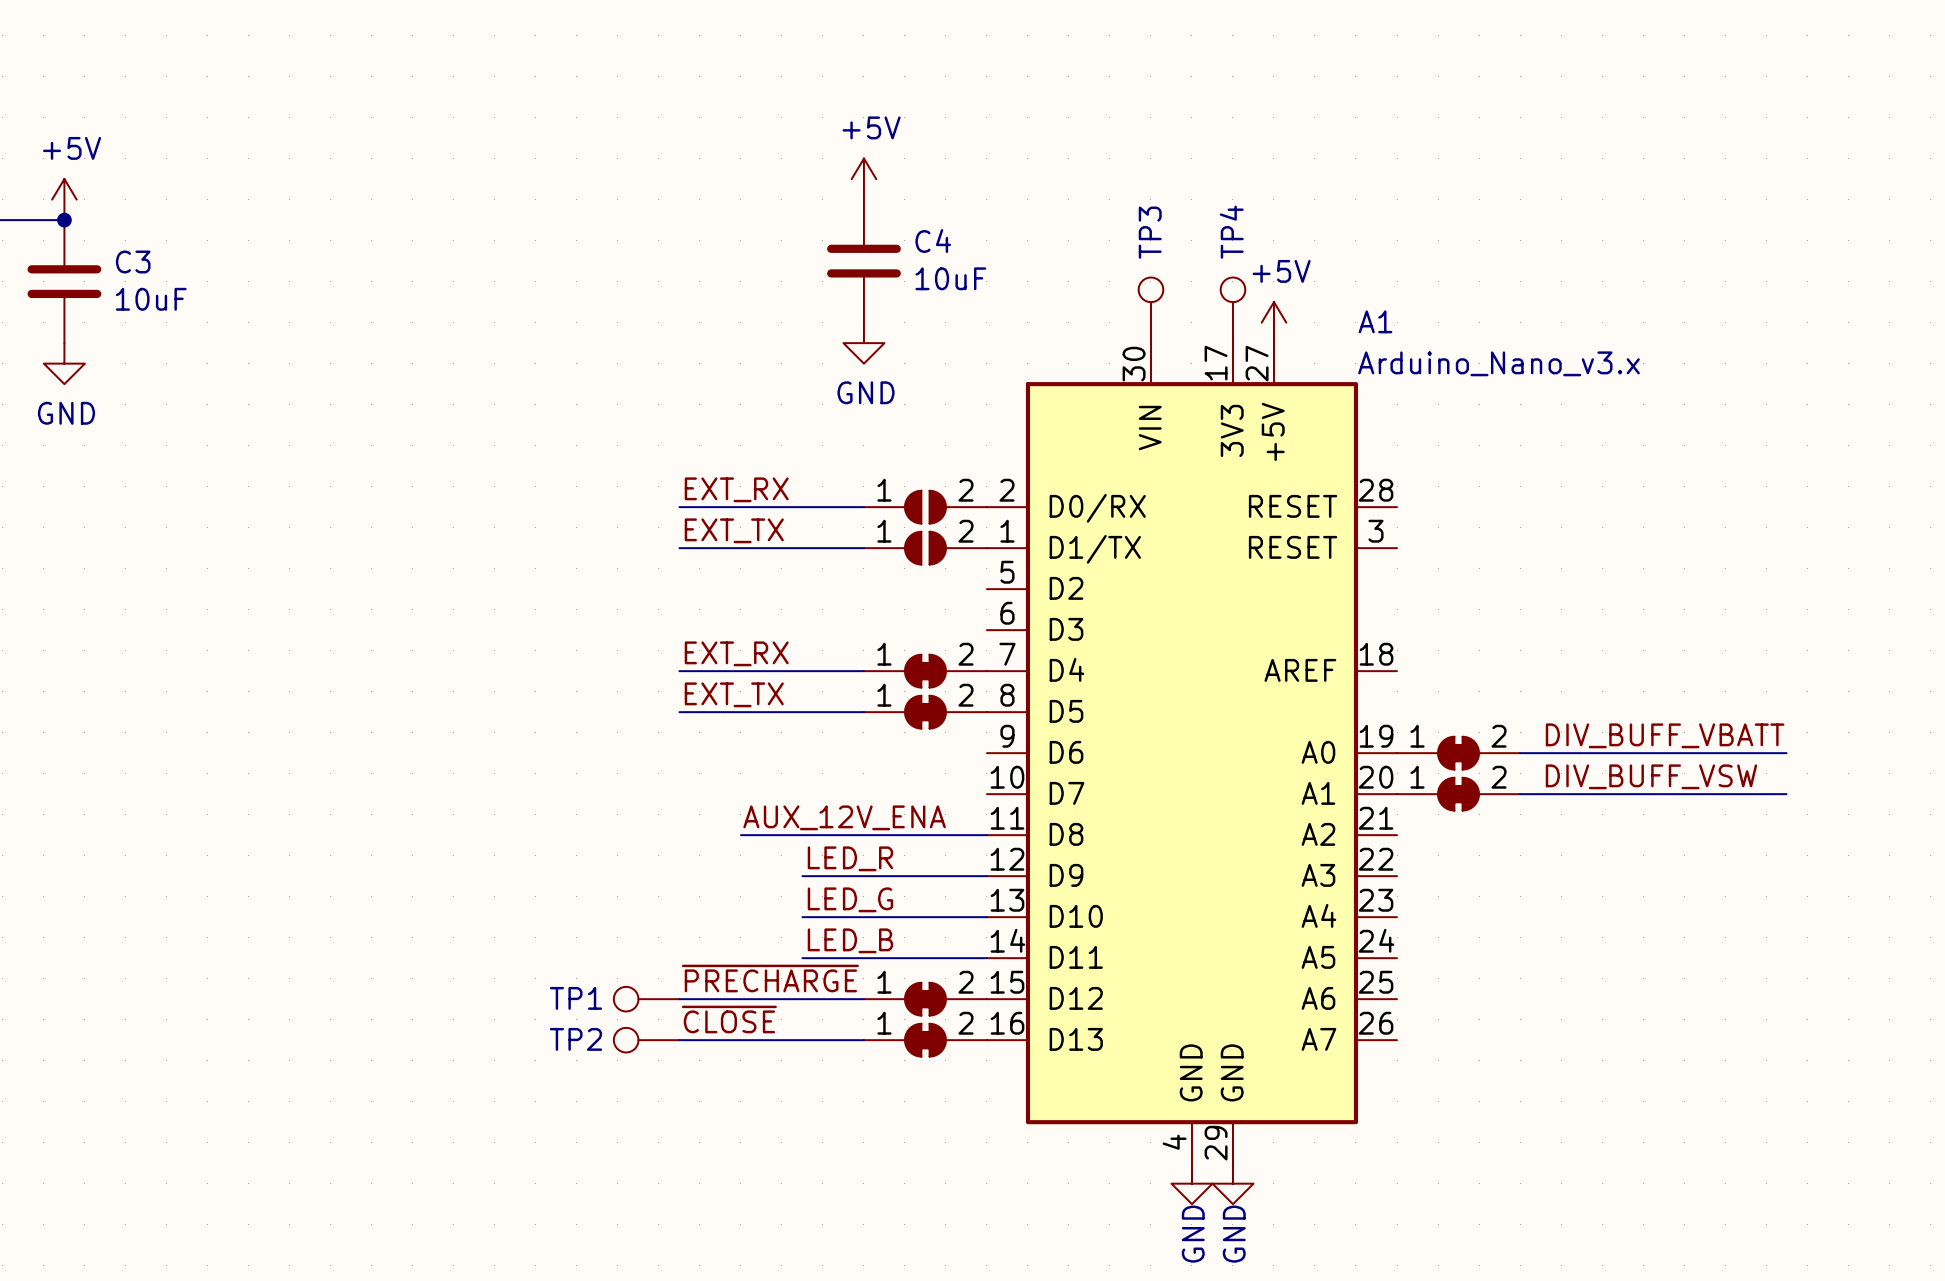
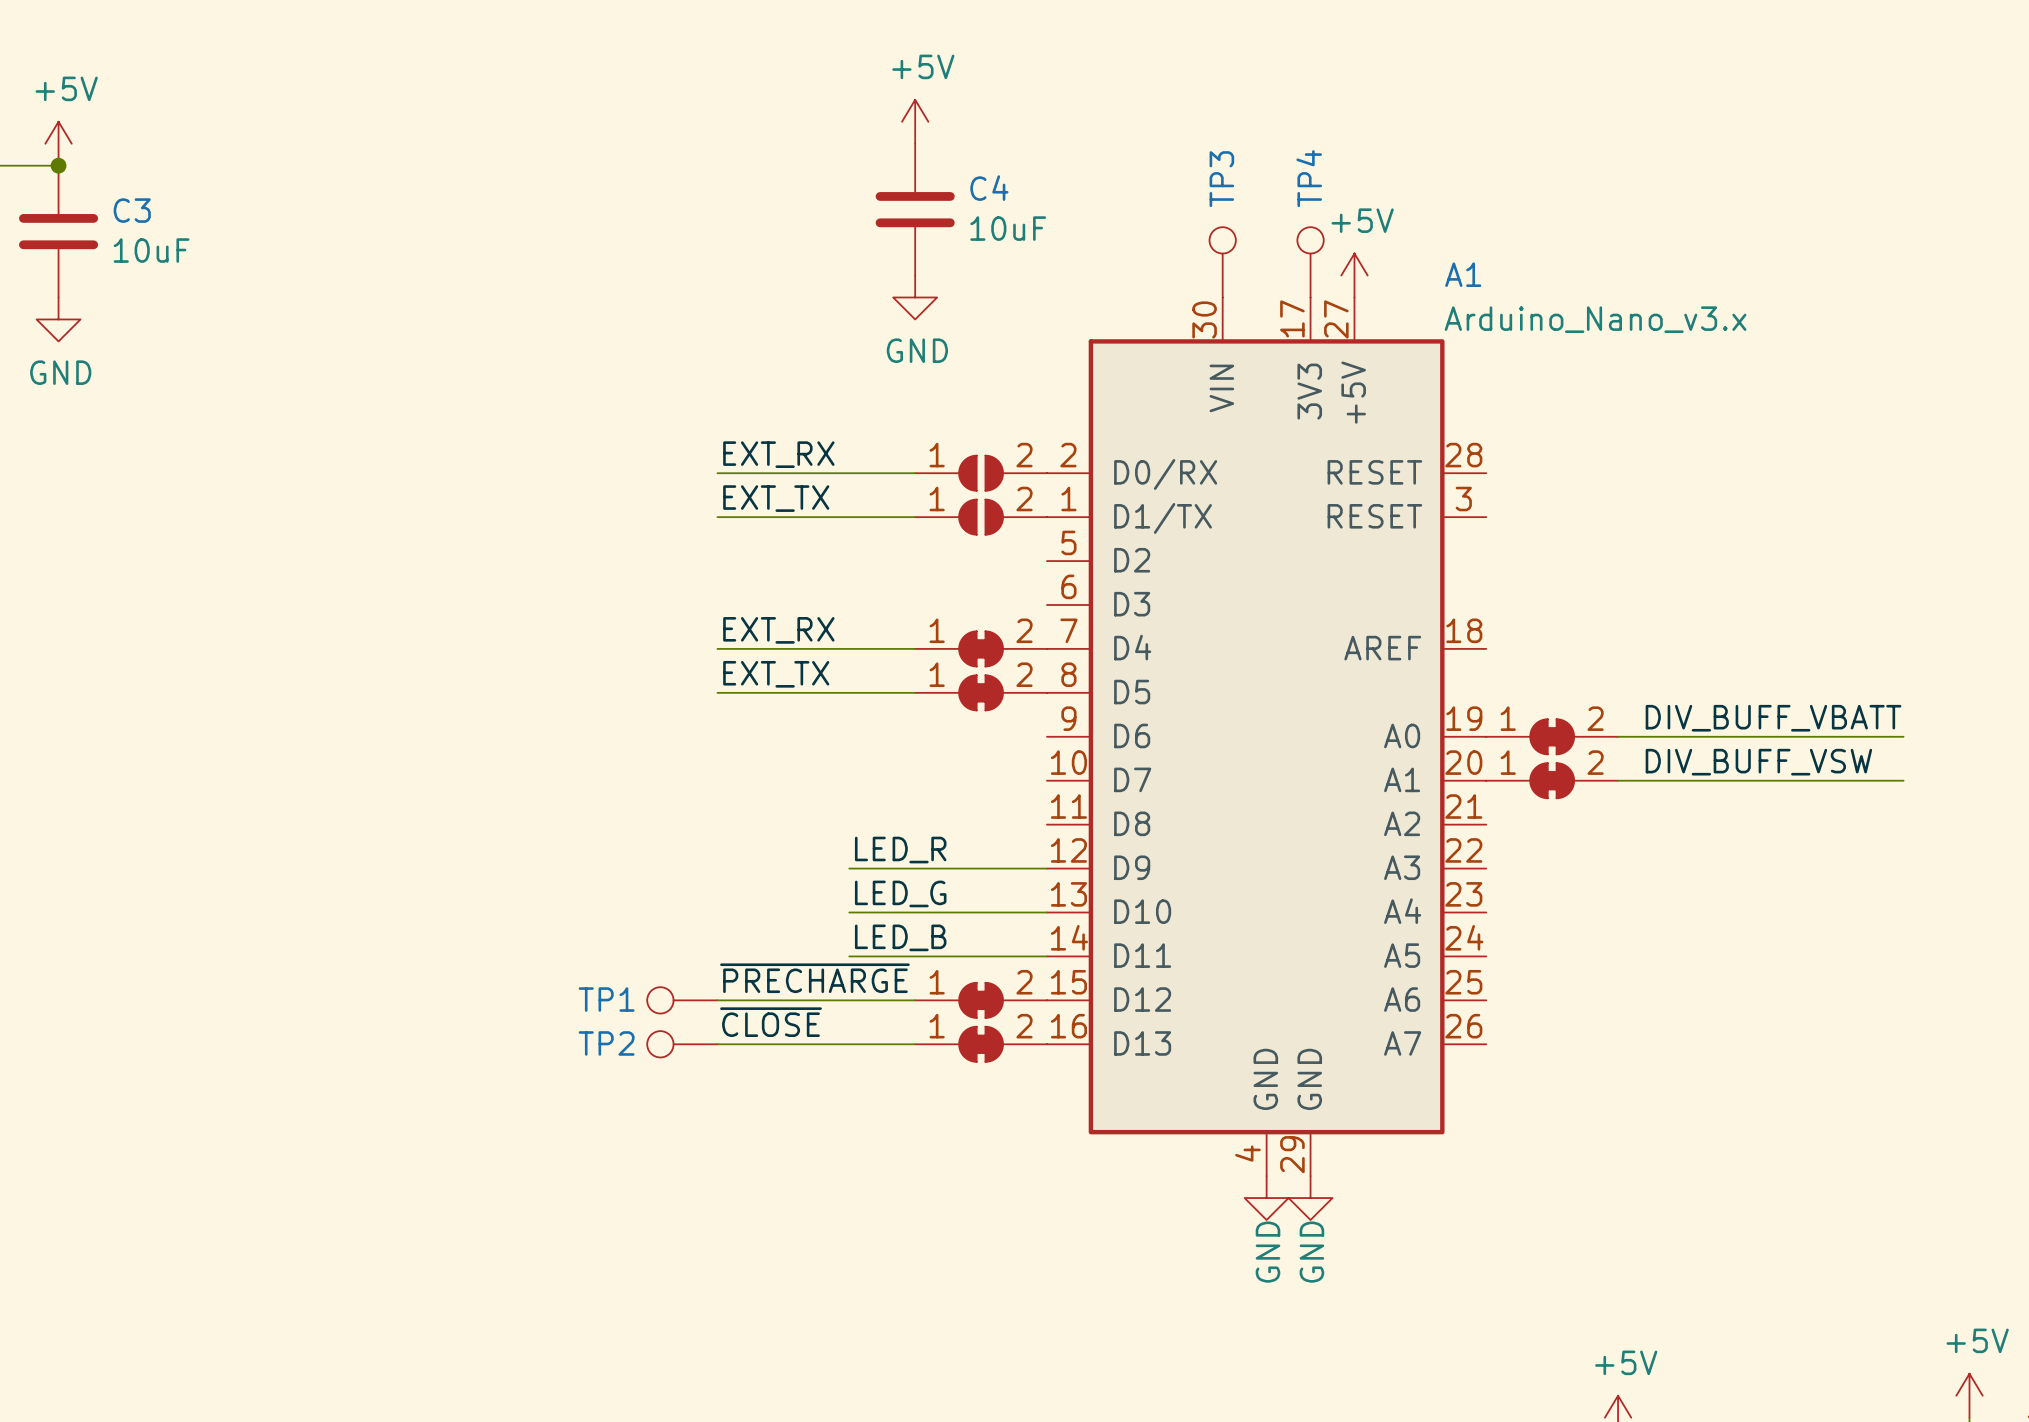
label: AUX_12V_ENA (844, 817) -> none
wire: (740, 835) (986, 835) -> none

